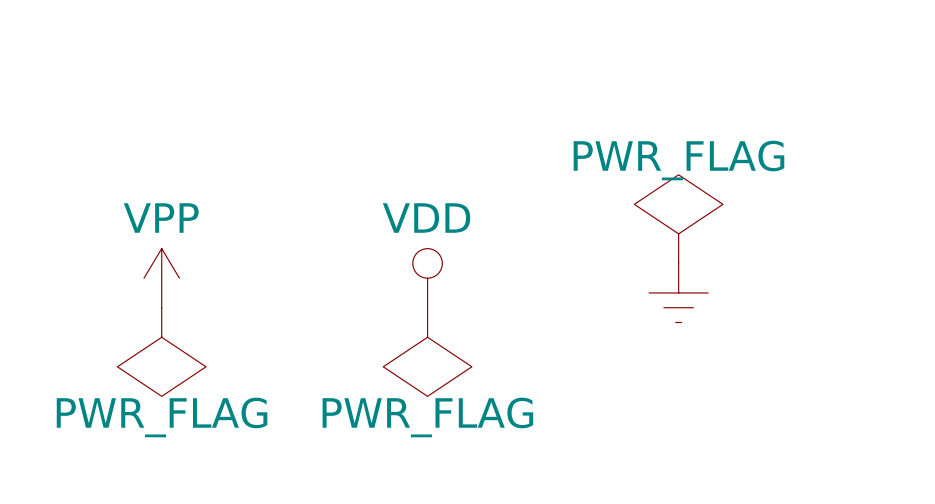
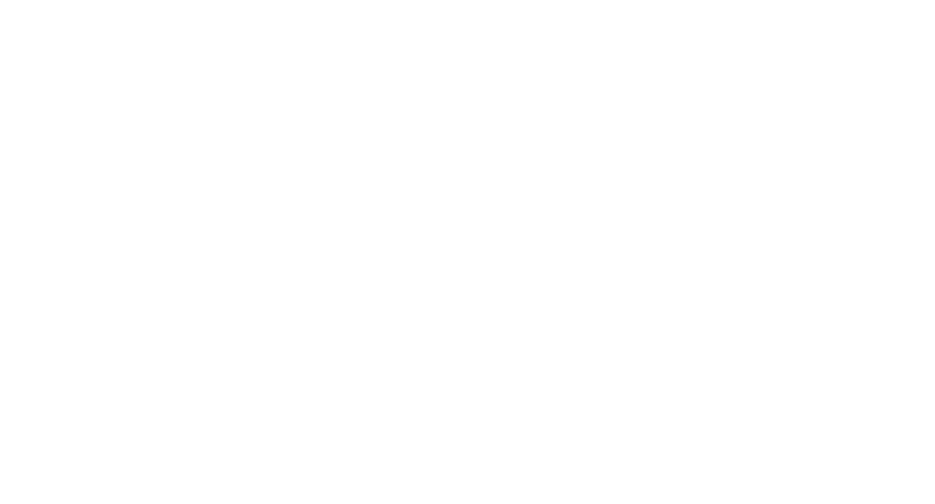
power symbol: PWR_FLAG (678, 219) -> none
power symbol: VPP (161, 278) -> none
power symbol: VDD (427, 278) -> none
power symbol: (678, 292) -> none
power symbol: PWR_FLAG (161, 352) -> none
power symbol: PWR_FLAG (427, 352) -> none

